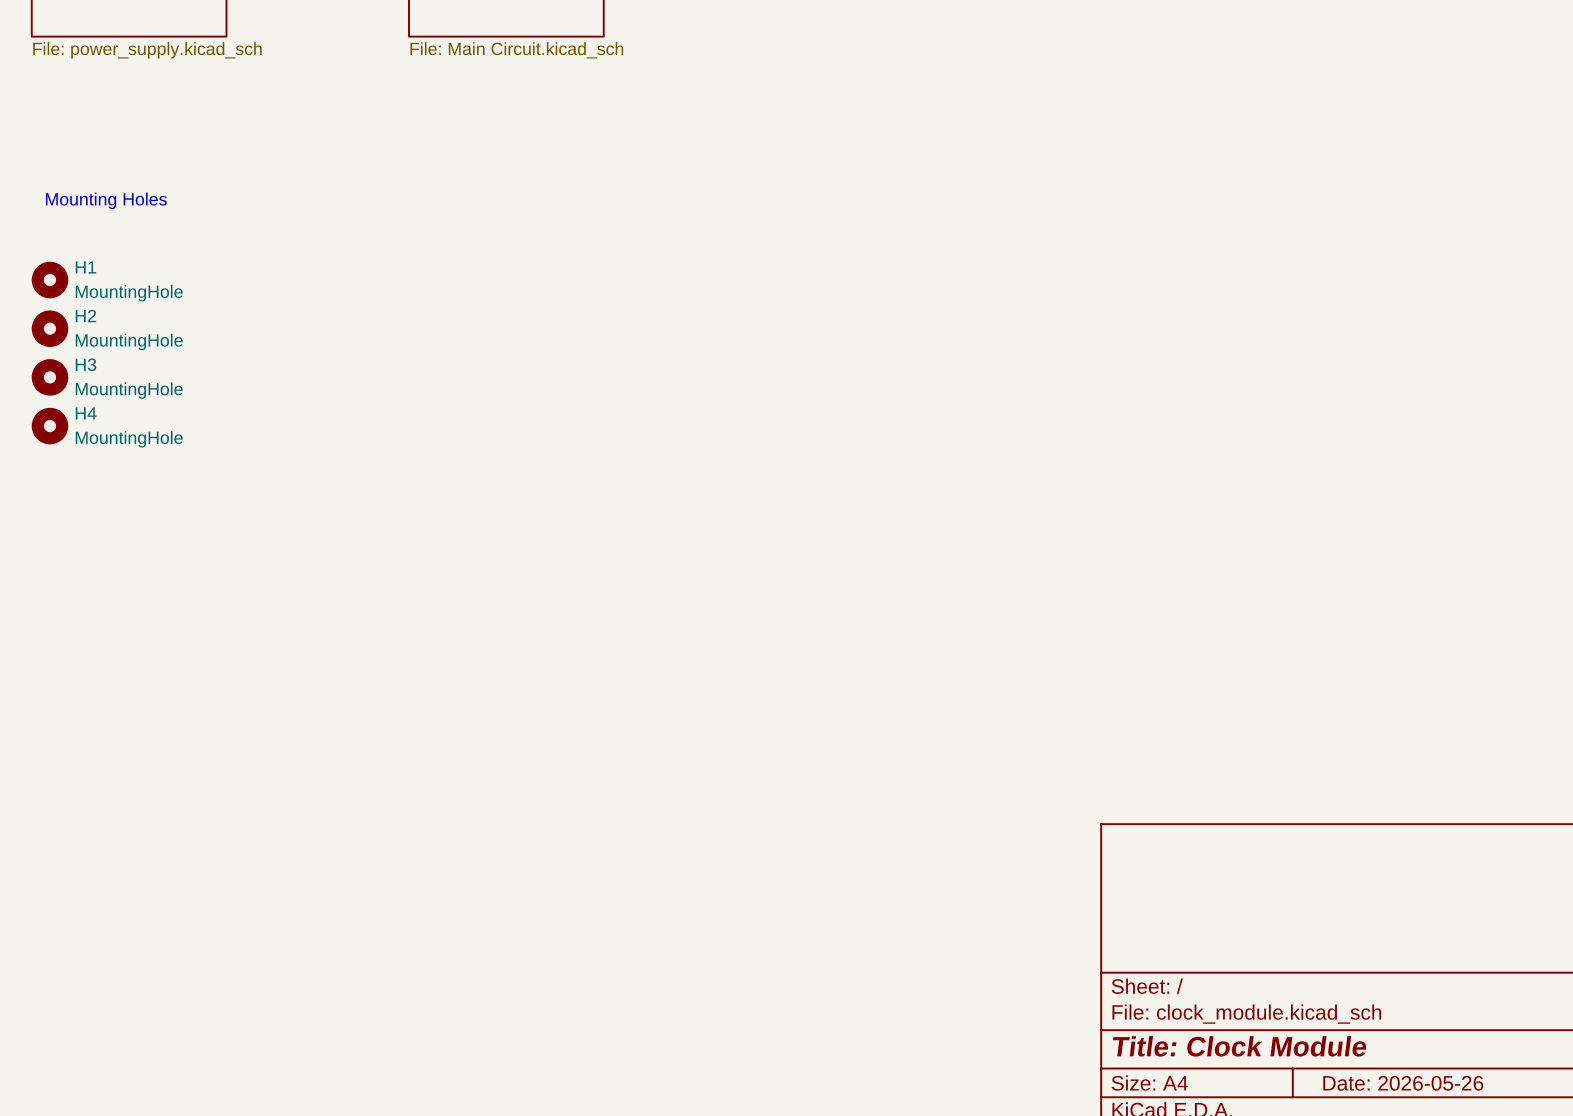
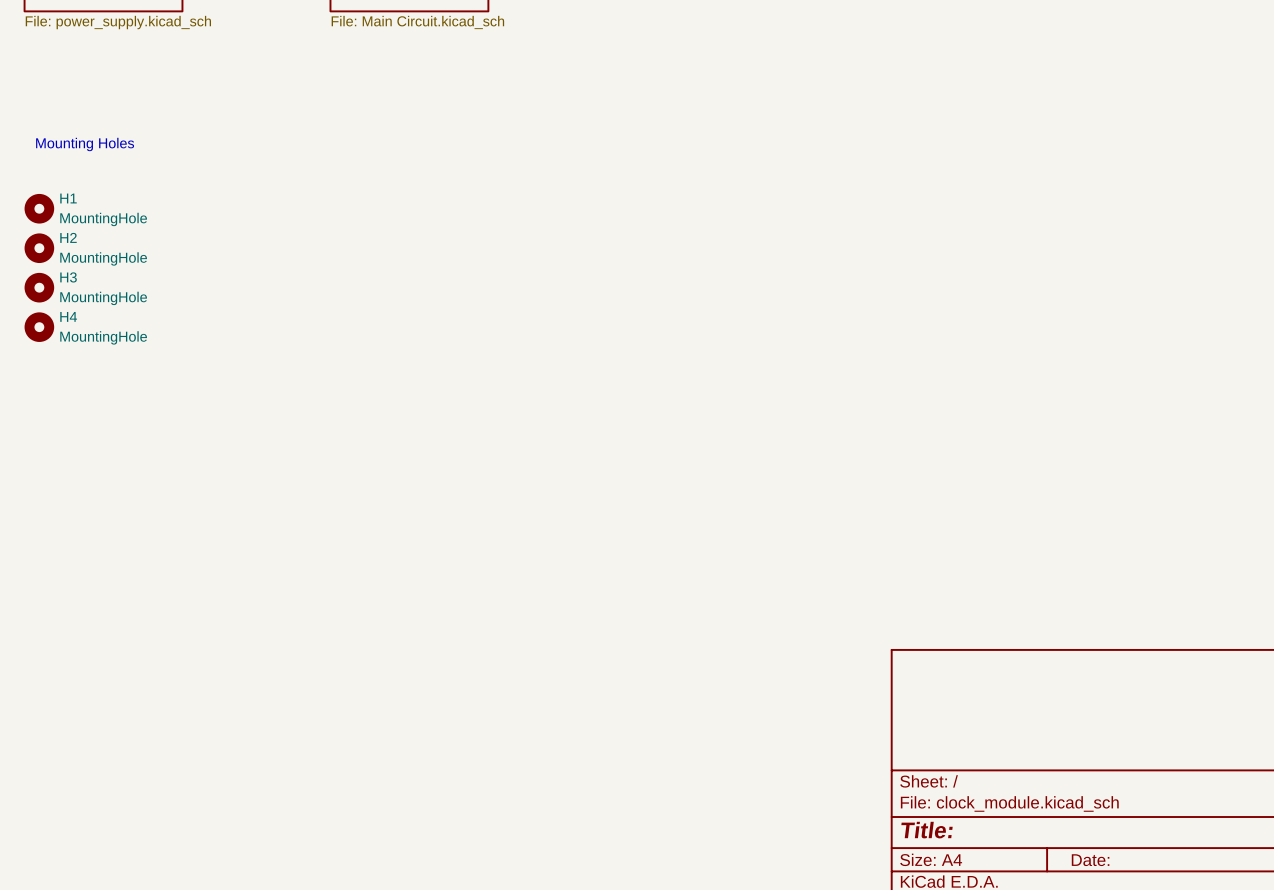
title block: Title: Clock Module (1239, 1046) -> Title: (927, 830)
title block: Date: 2026-05-26 (1403, 1083) -> Date: (1090, 860)

